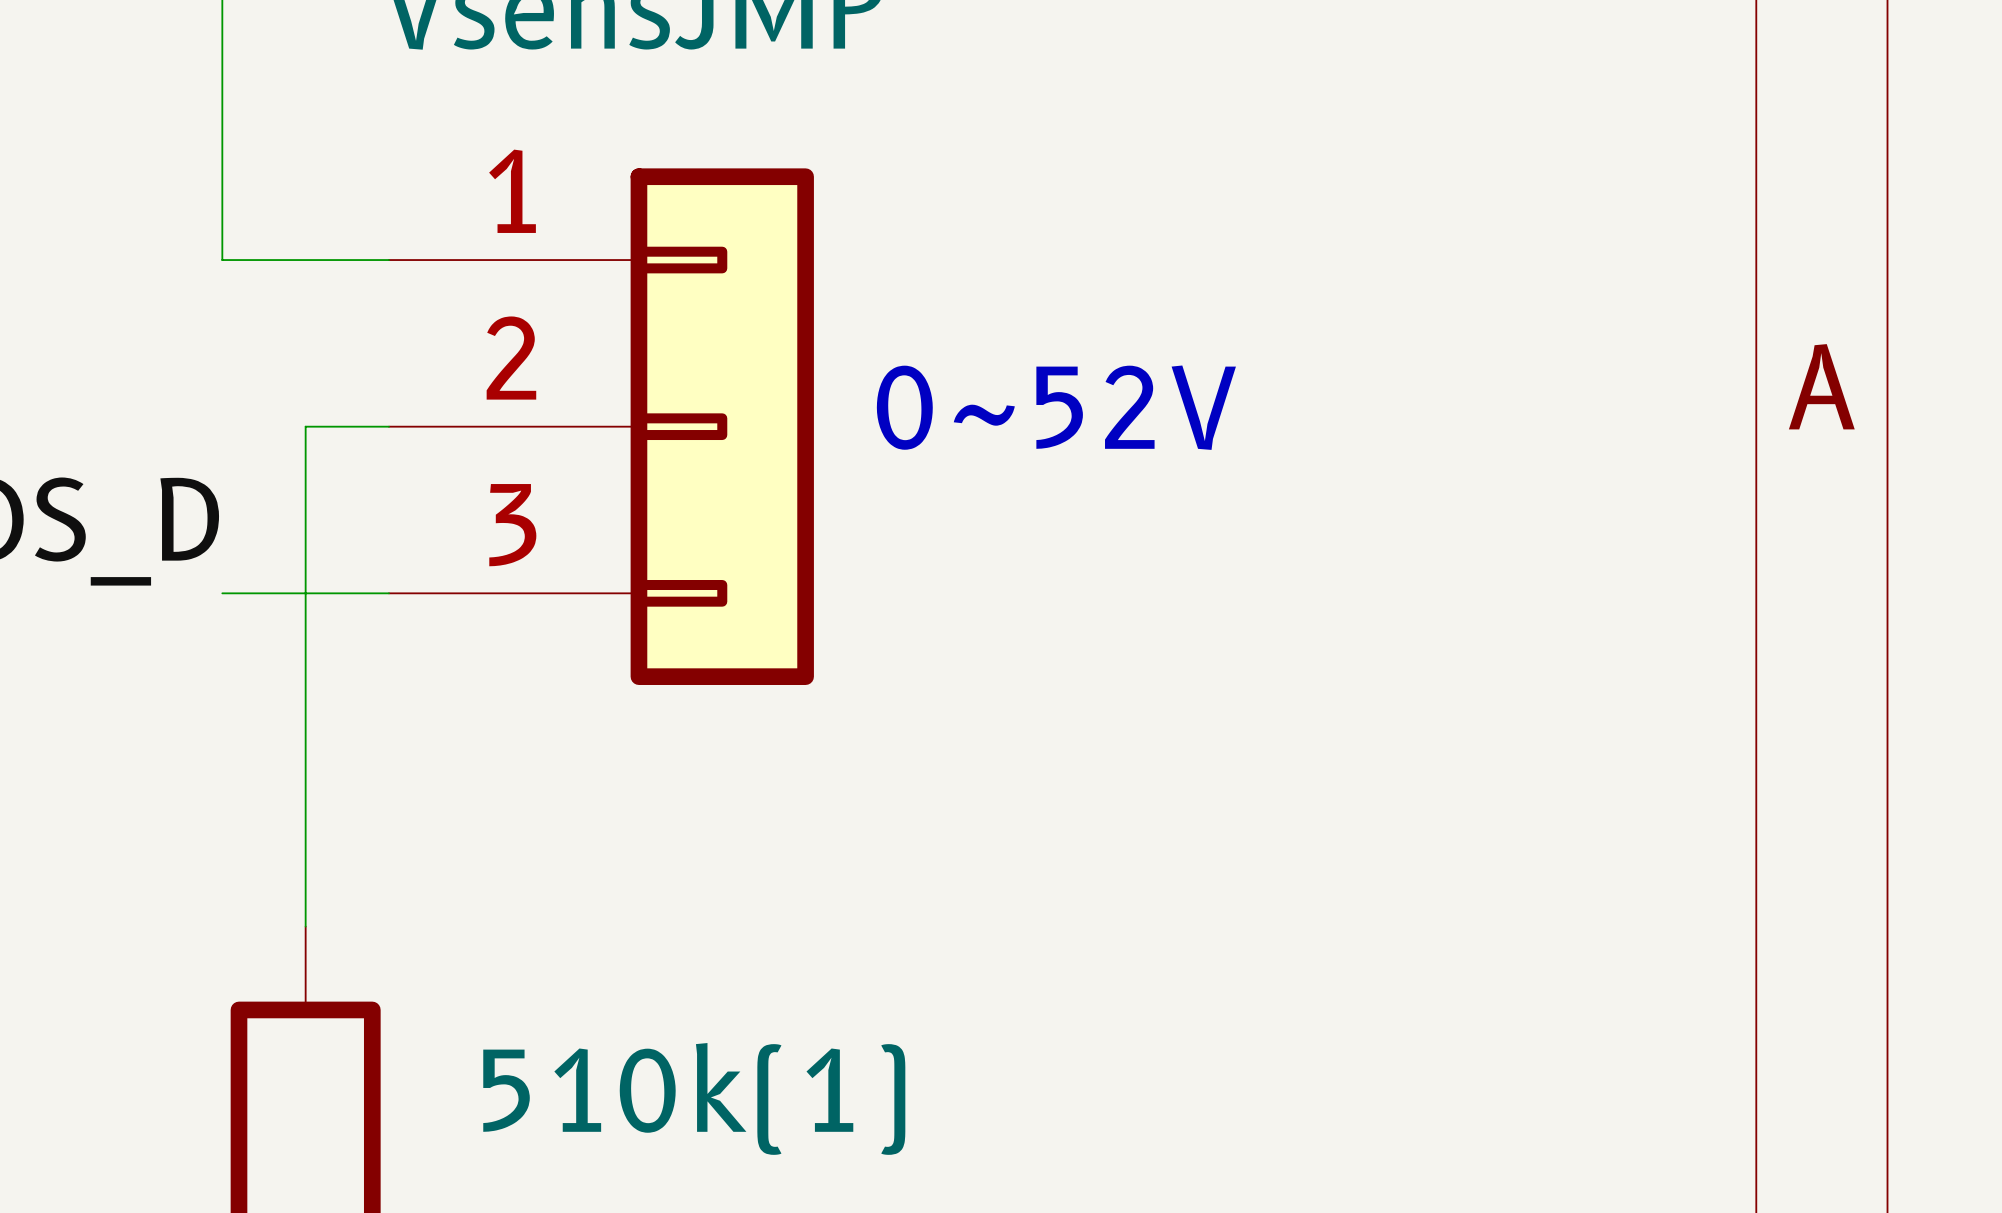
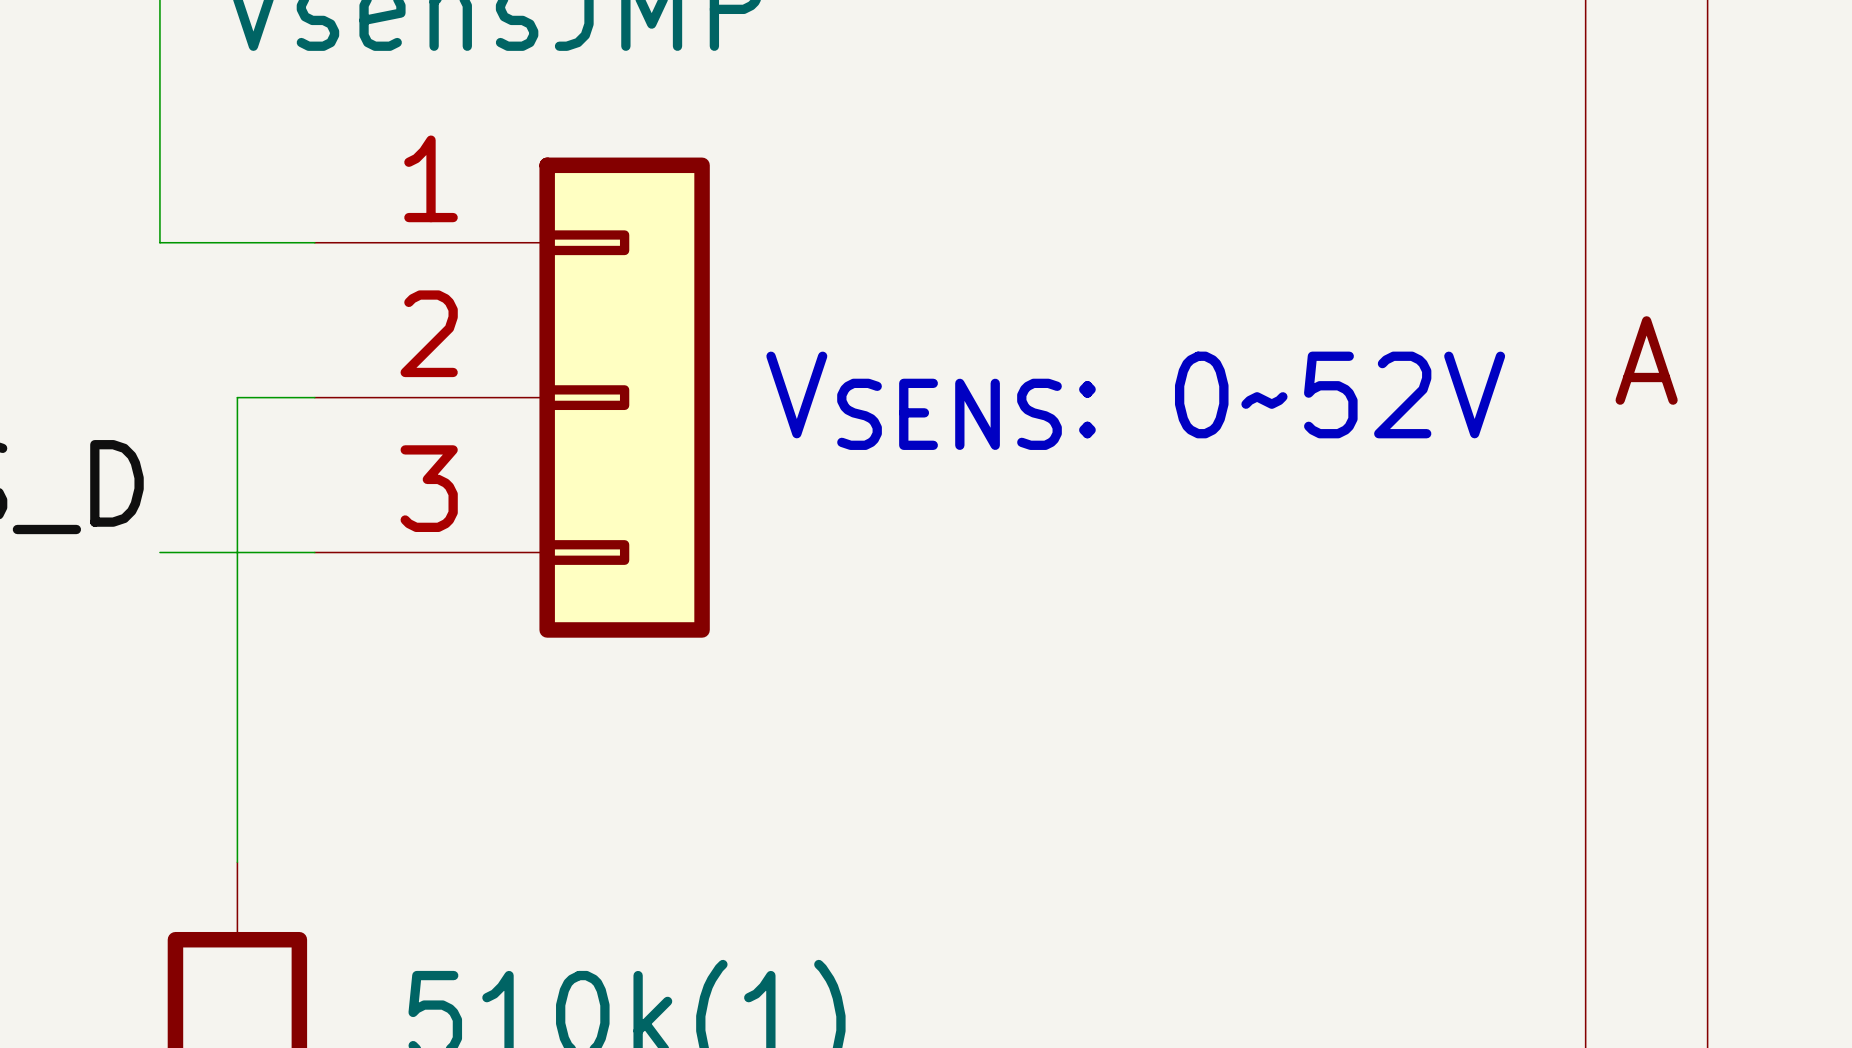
text: 0~52V (1056, 407) -> none
text: none -> VSENS: 0~52V (1135, 400)

